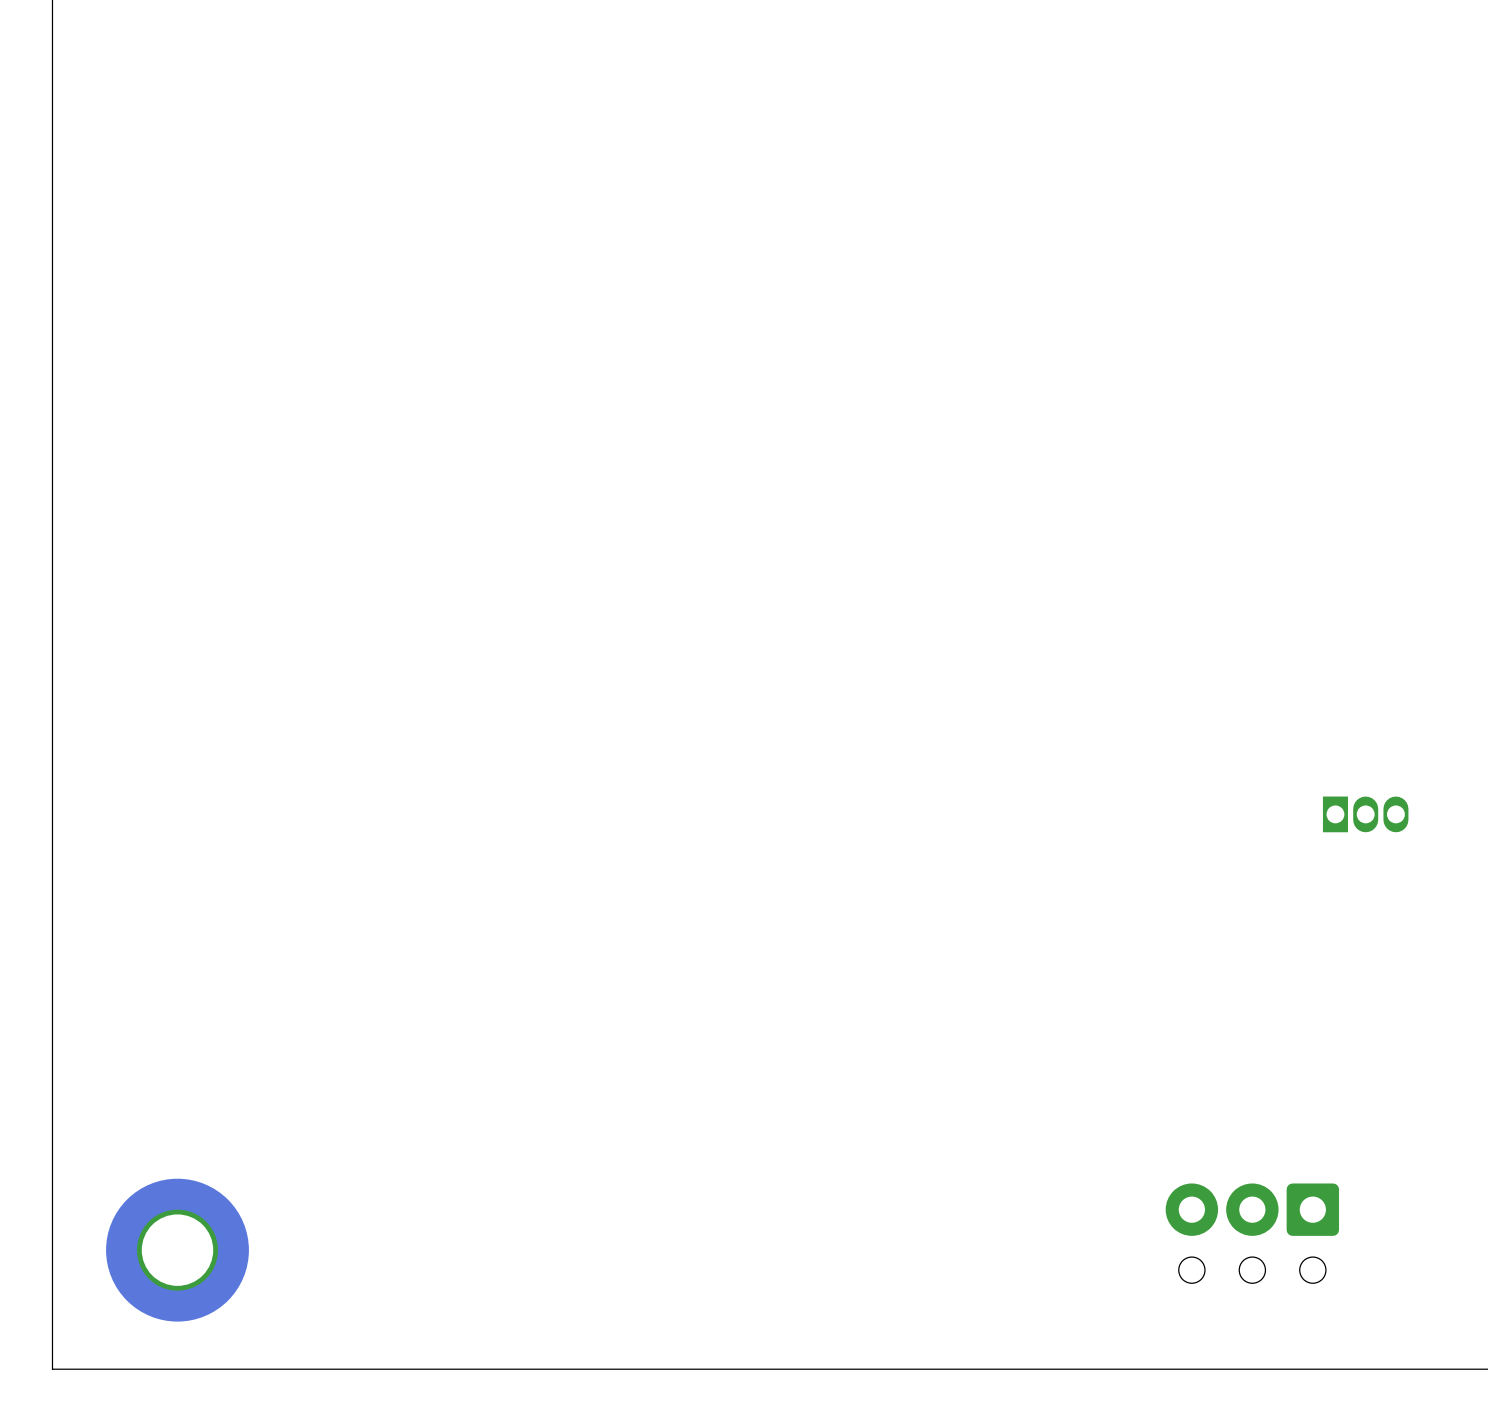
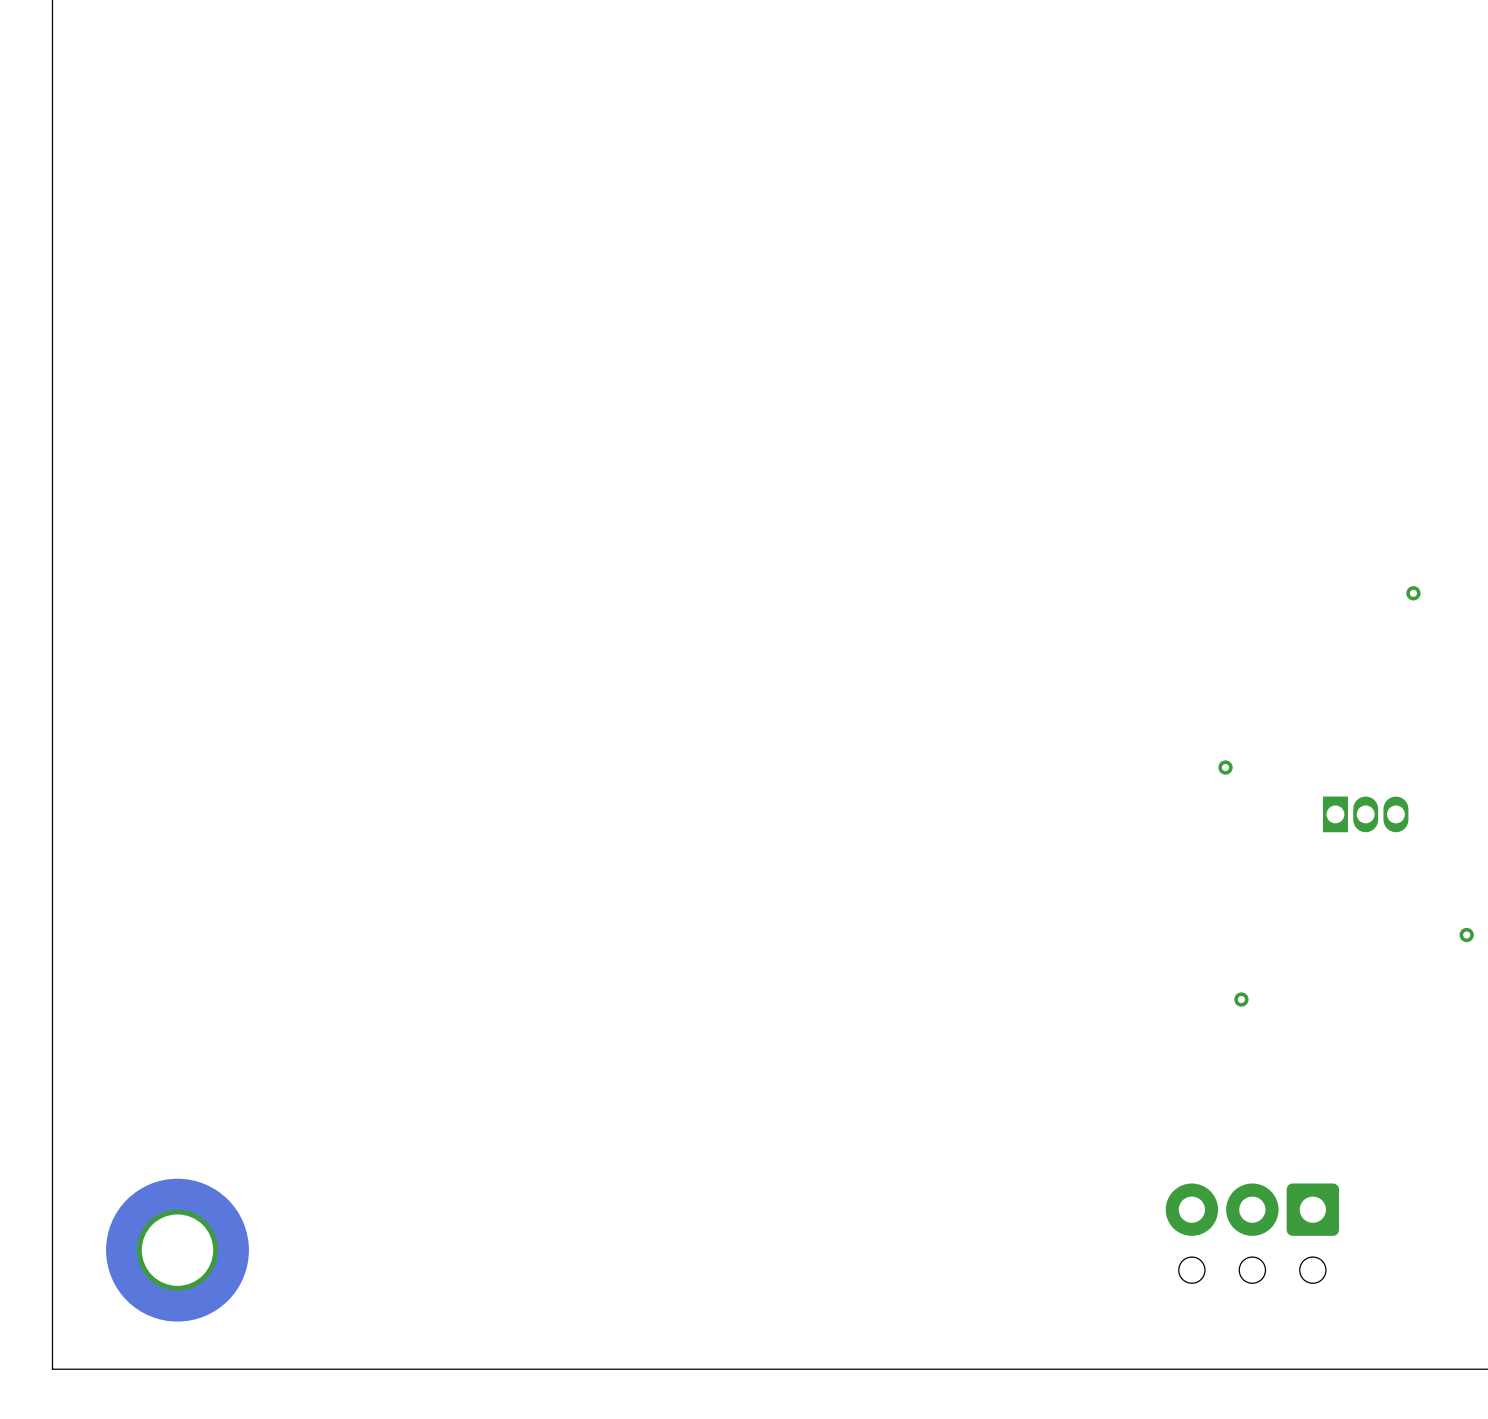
via: none -> (1413, 593)
via: none -> (1225, 767)
via: none -> (1466, 935)
via: none -> (1241, 999)

